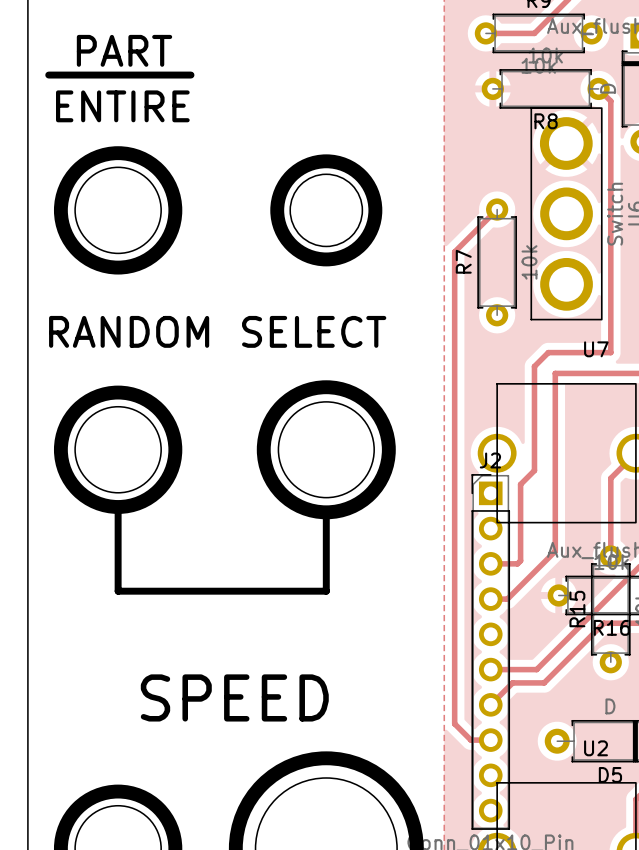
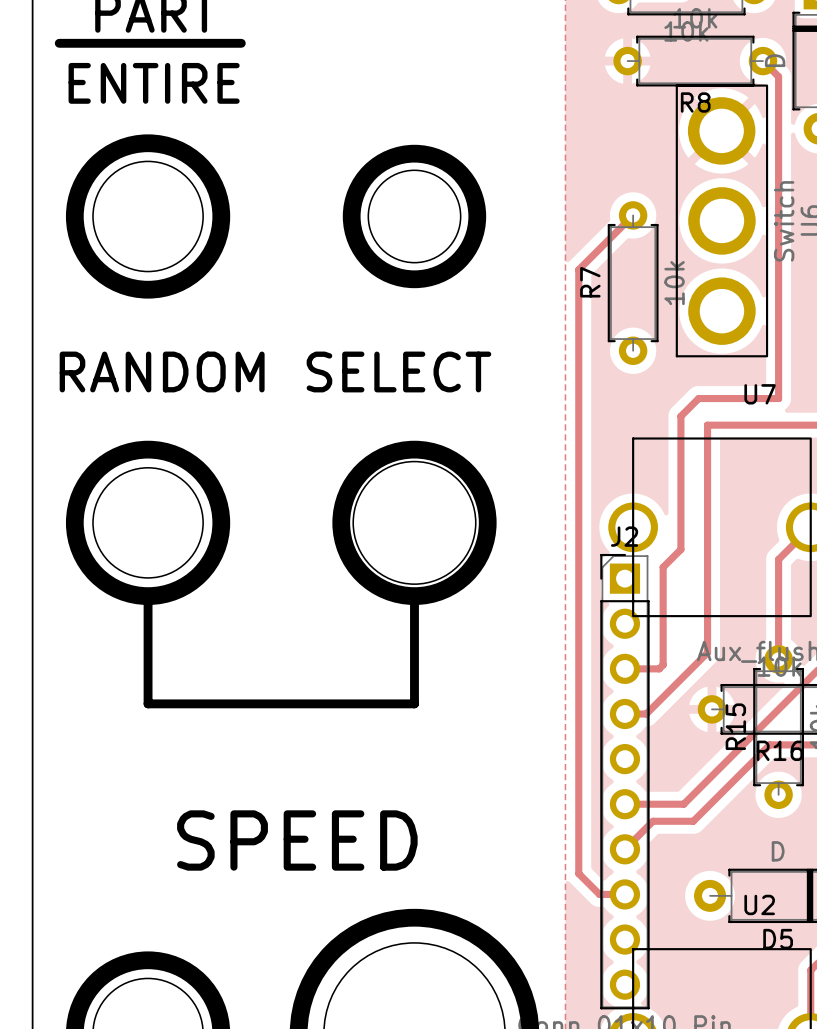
drawing shape: [256, 380, 396, 520] -> [332, 440, 497, 605]

